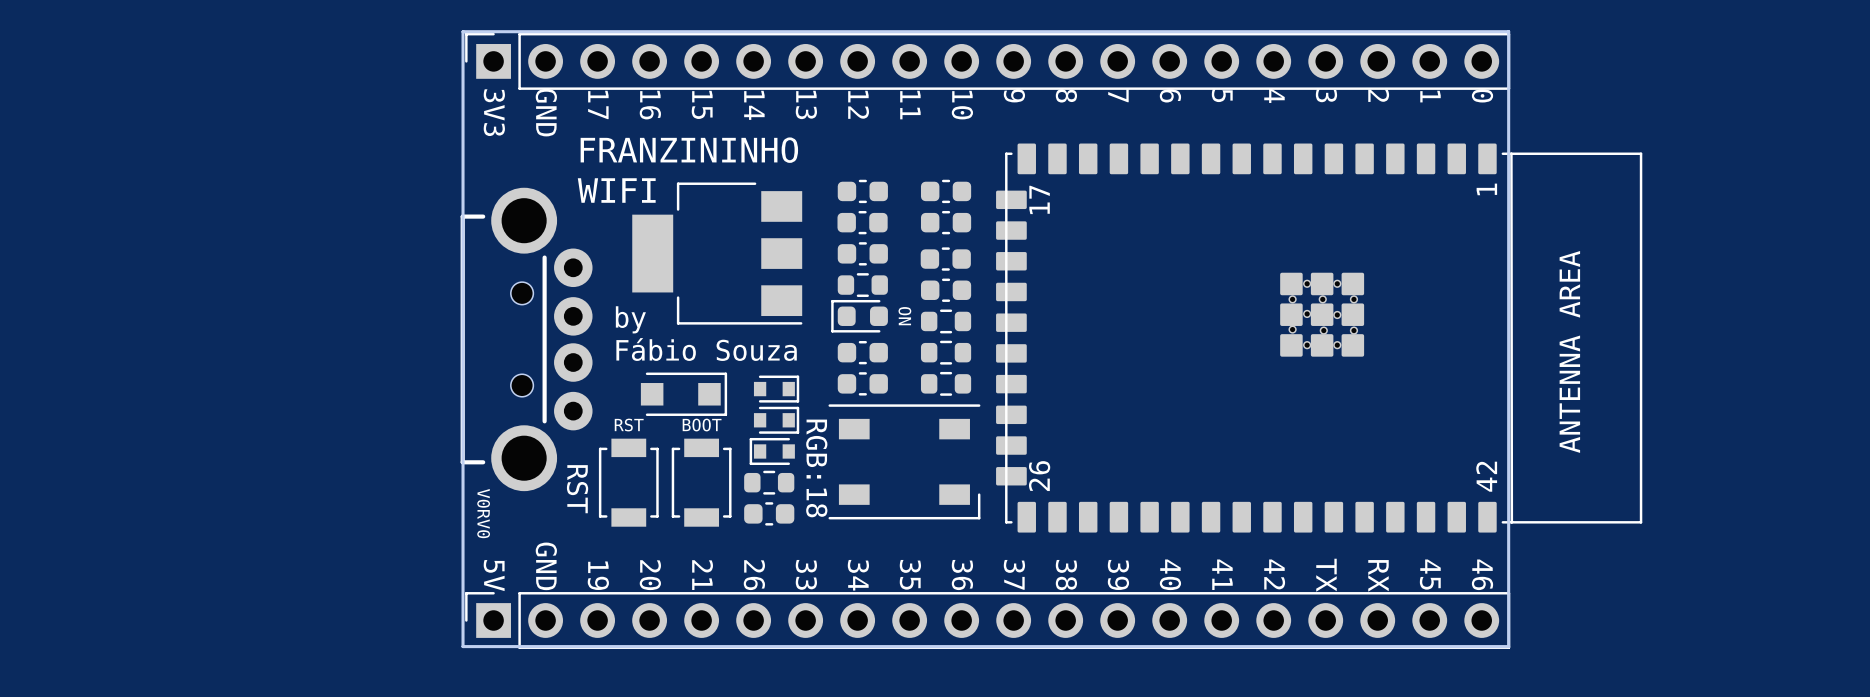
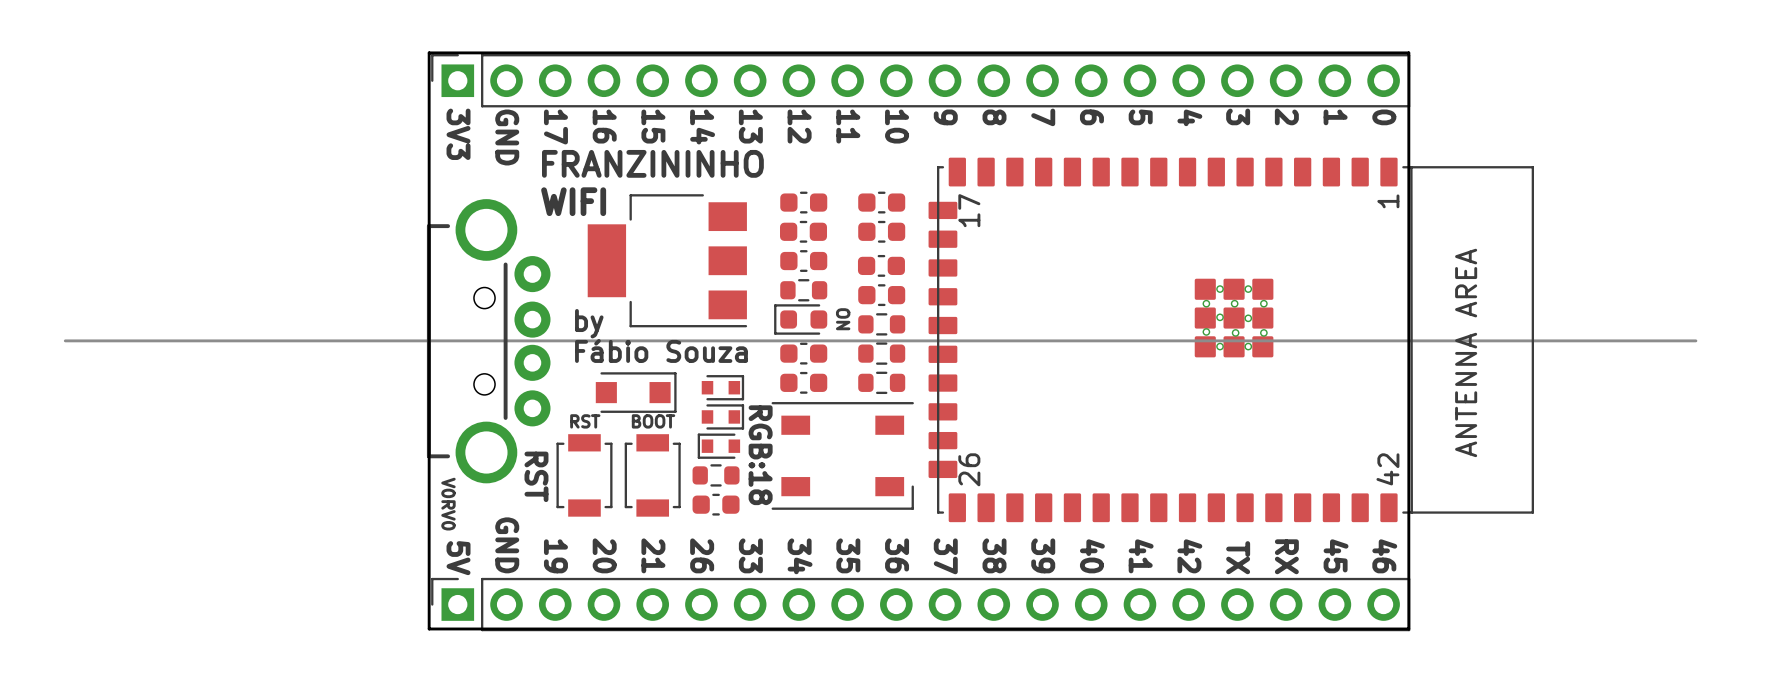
line: none -> (65, 340) (1695, 340)

